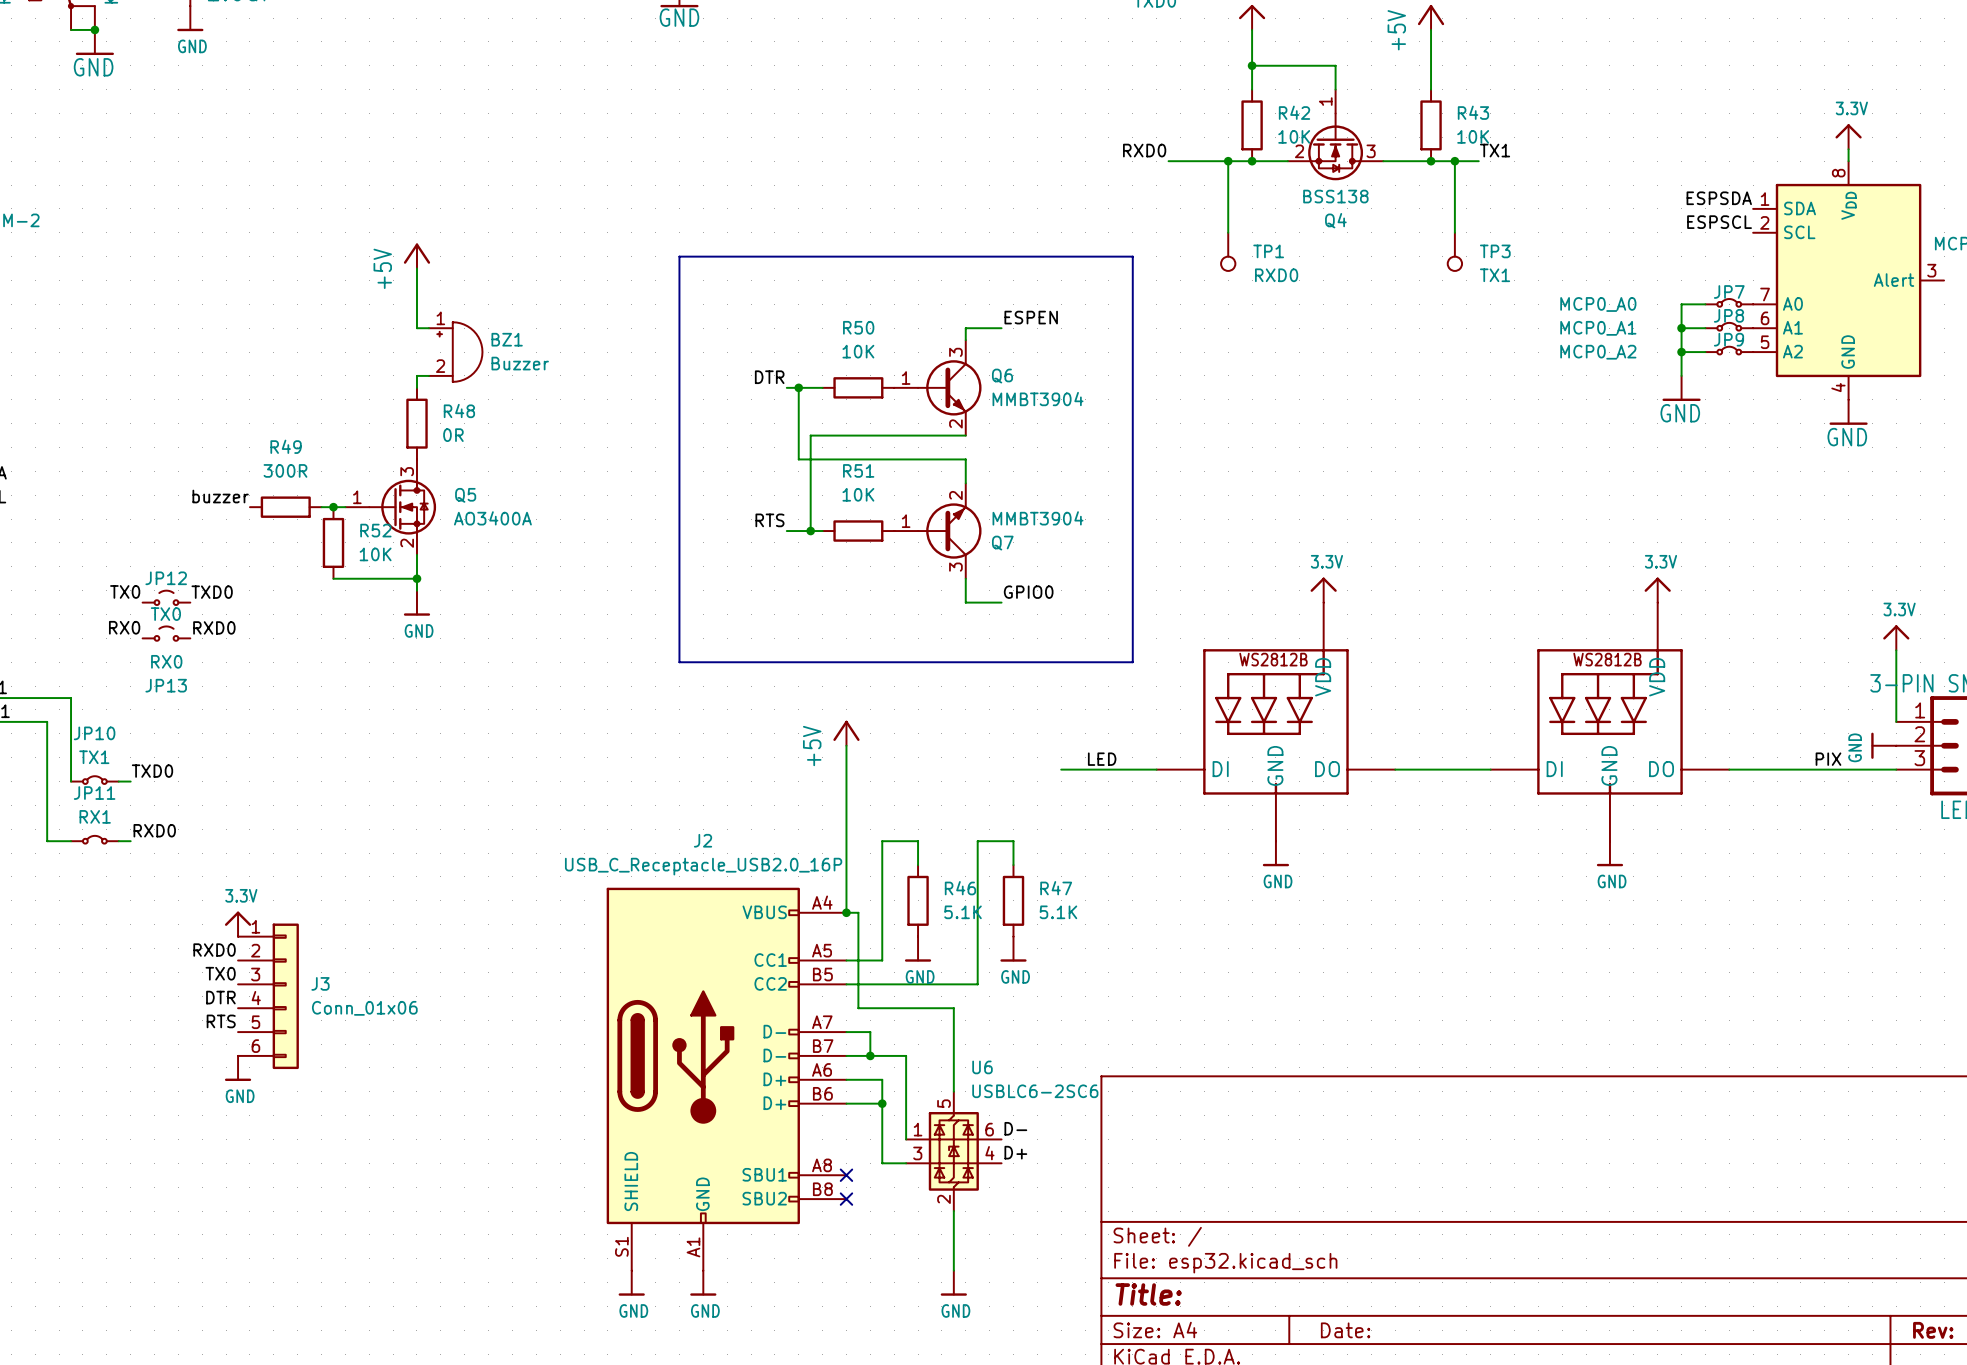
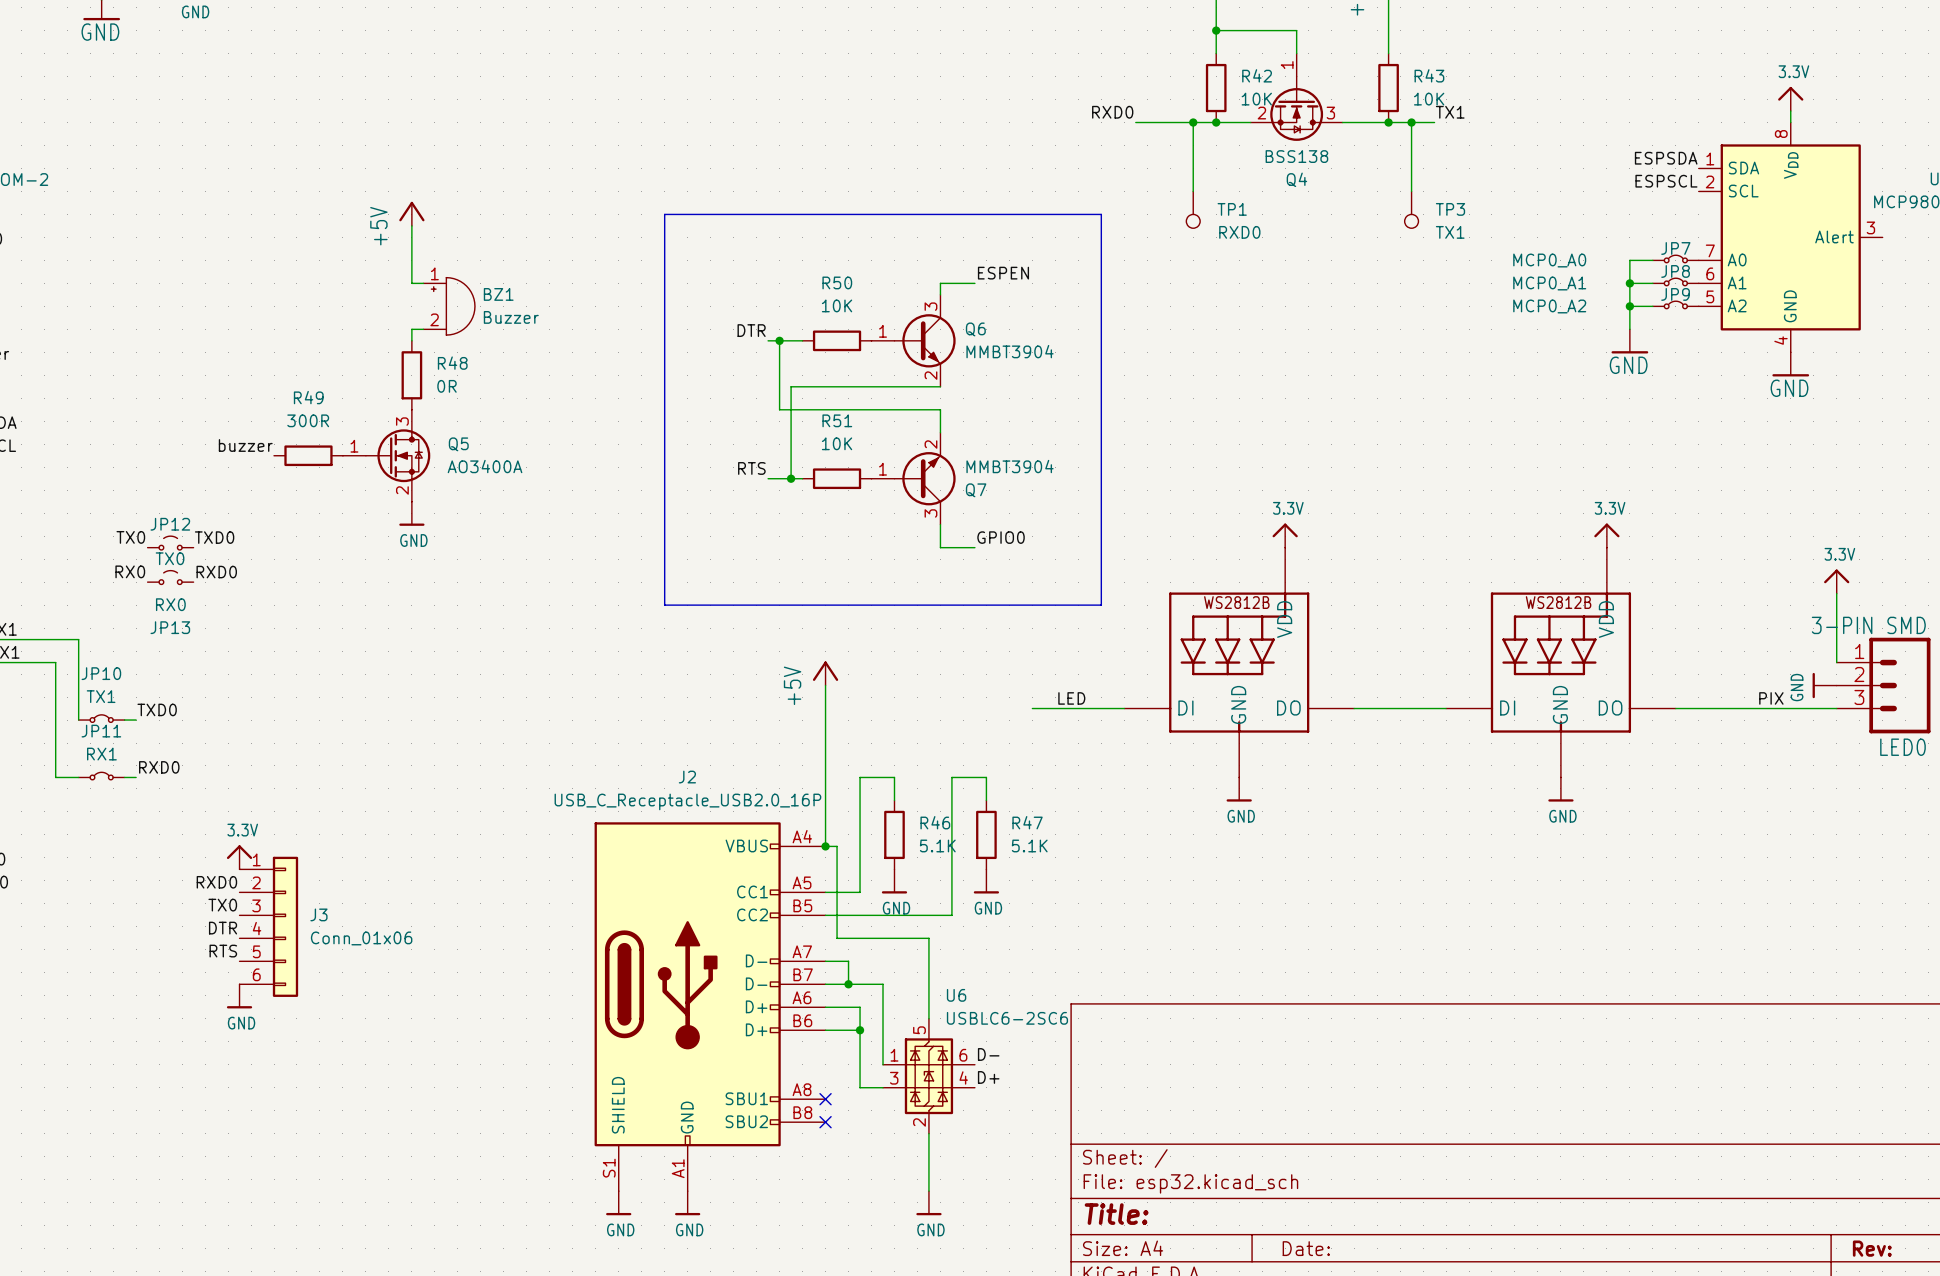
label position: buzzer (220, 496) -> buzzer (245, 445)
R49 position: (285, 507) -> (308, 455)
junction: (333, 507) -> none
R52: 10K (333, 542) -> none
wire: (333, 578) (416, 578) -> none
junction: (416, 578) -> none
power symbol position: GND (416, 603) -> GND (411, 513)

